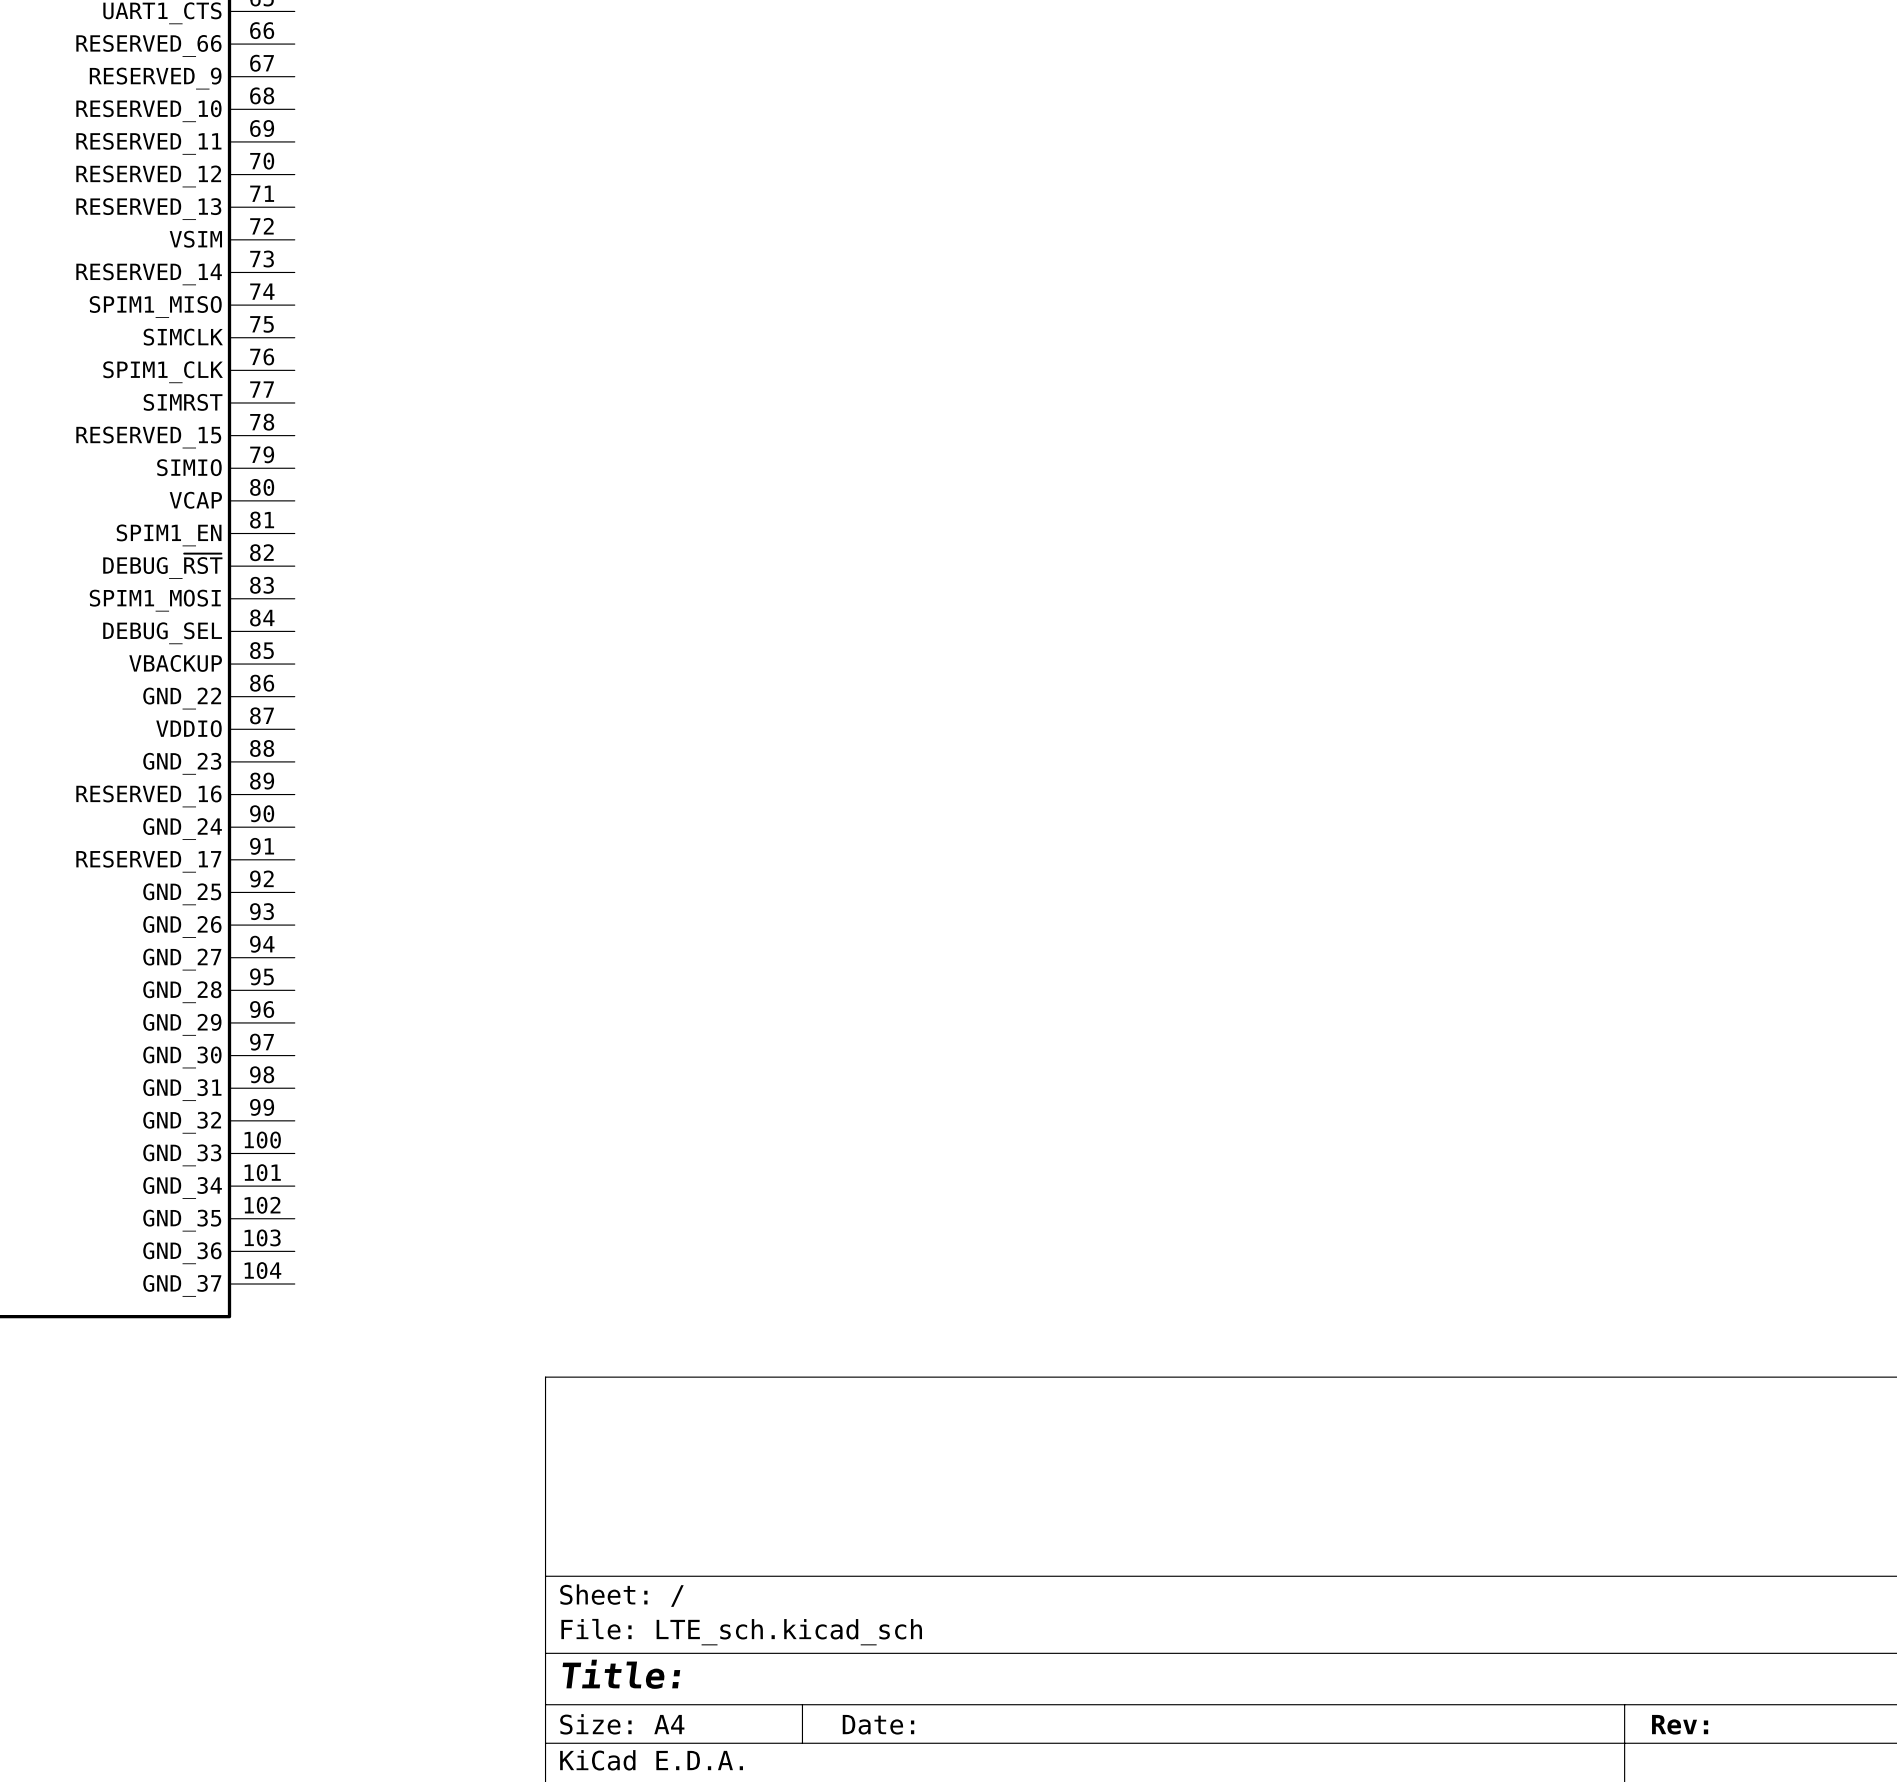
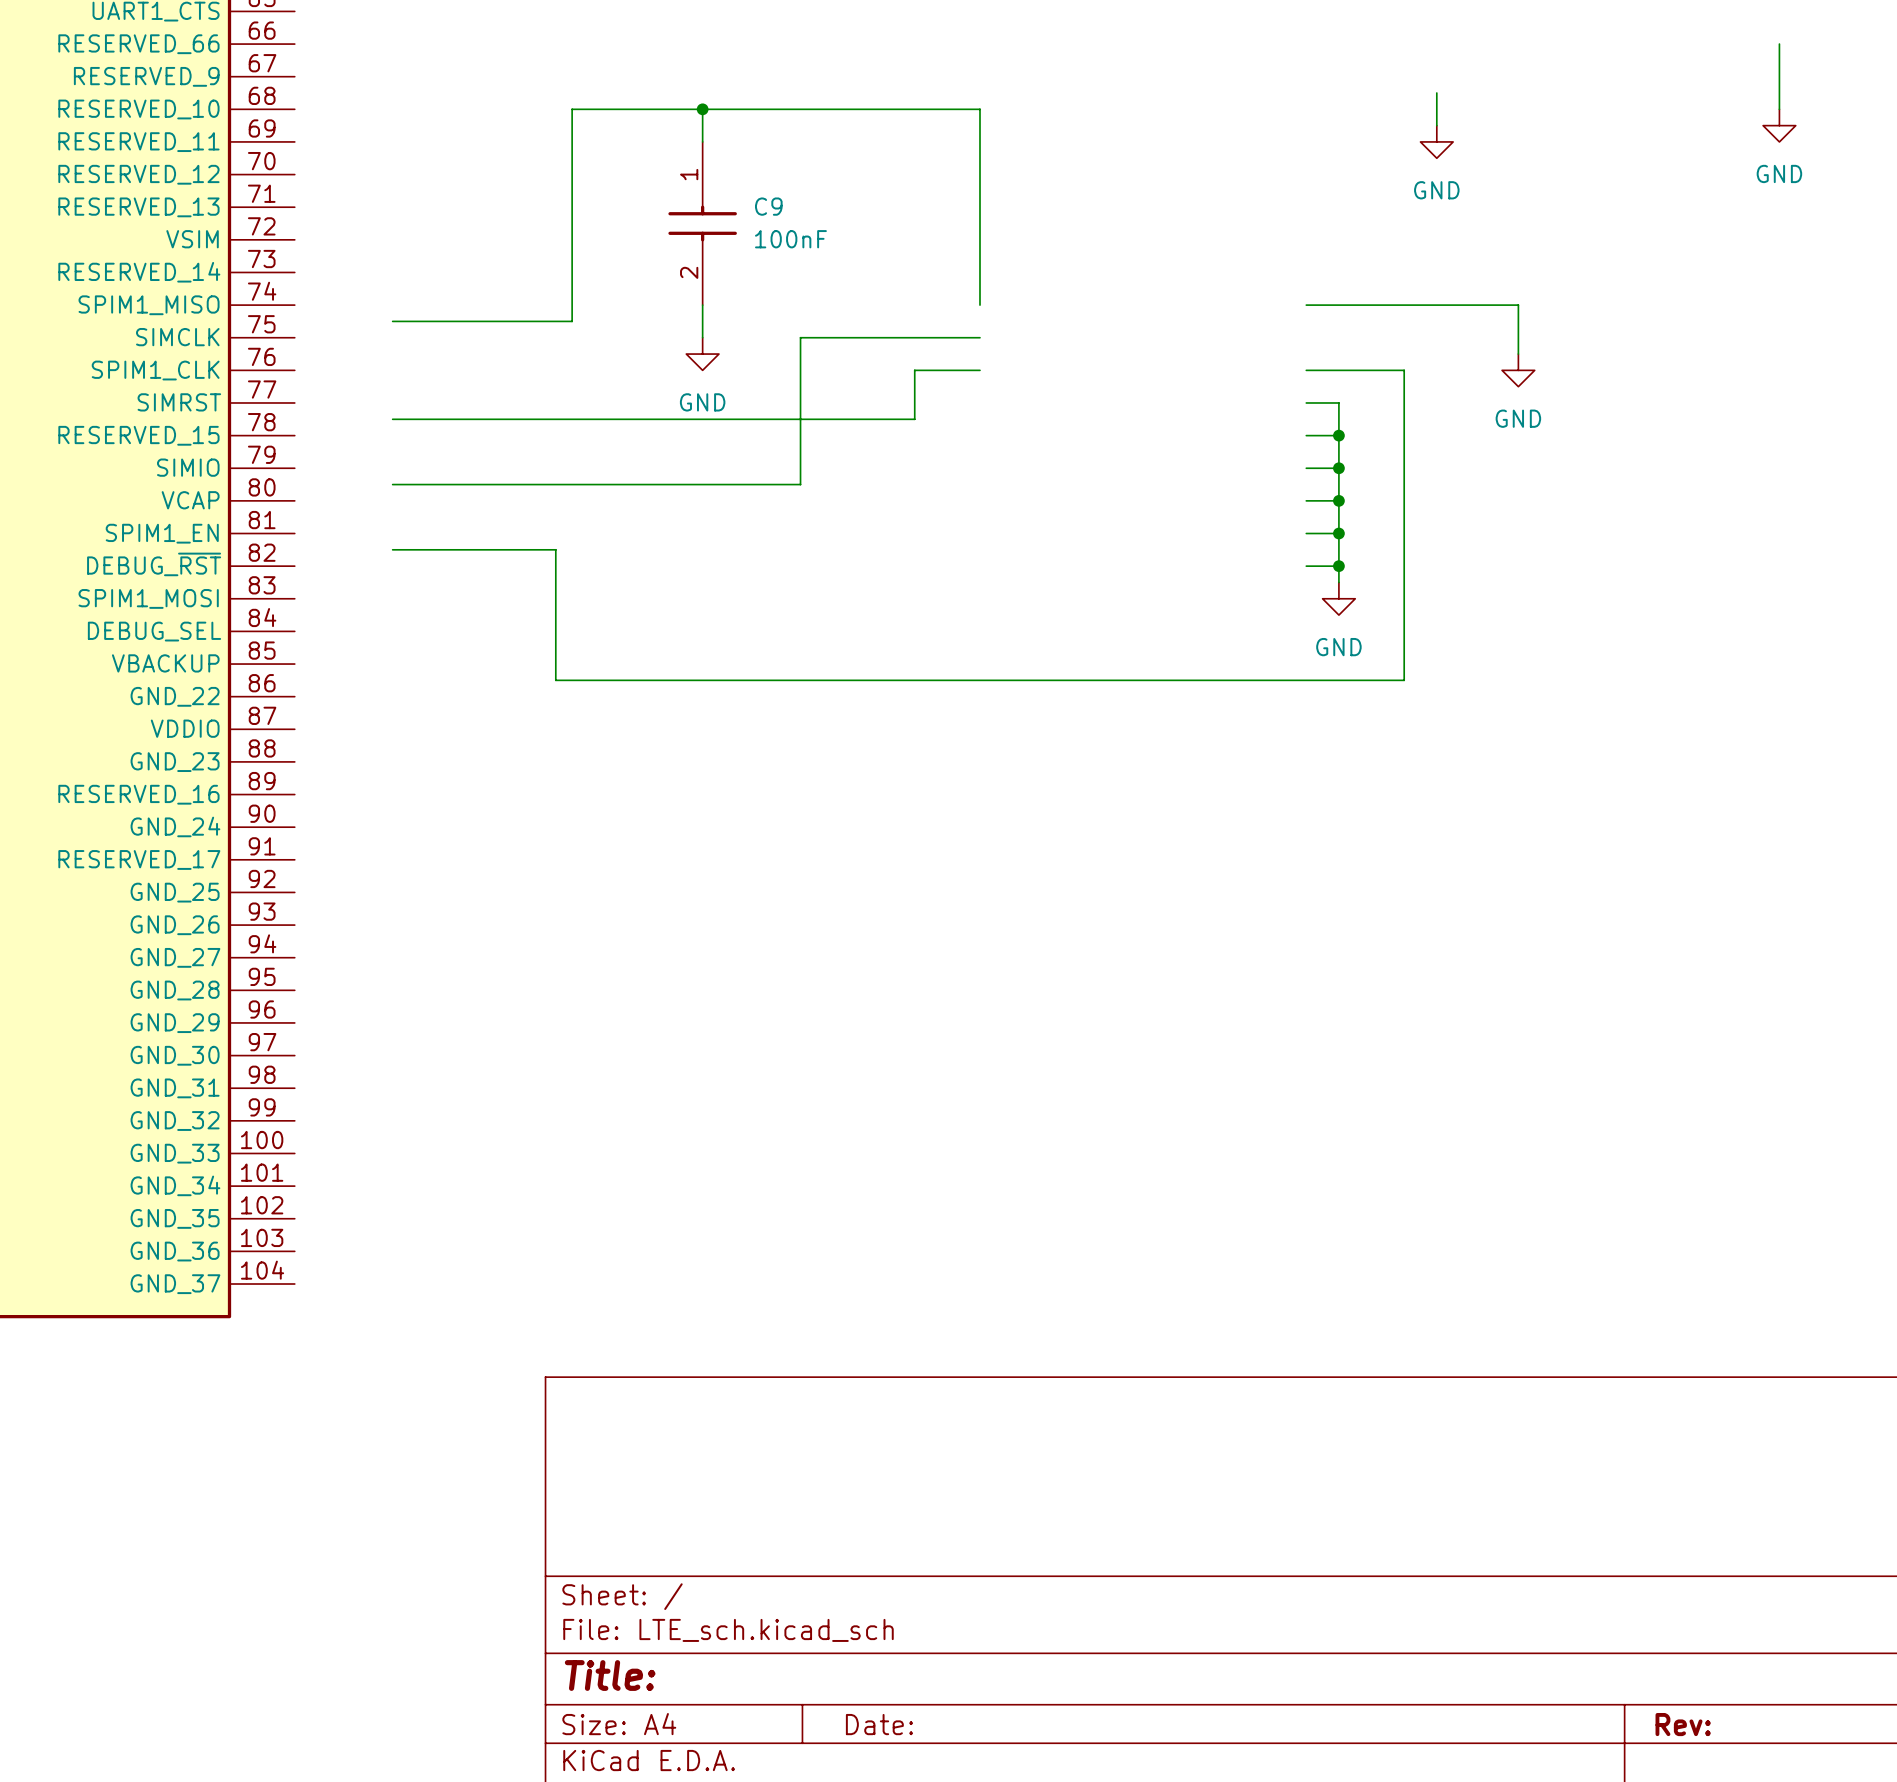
wire: none -> (1779, 44) (1779, 109)
wire: none -> (1436, 93) (1436, 125)
wire: none -> (702, 109) (702, 141)
junction: none -> (702, 109)
power symbol: none -> GND (1779, 125)
power symbol: none -> GND (1436, 141)
C9: none -> 100nF (702, 223)
wire: none -> (702, 305) (702, 337)
wire: none -> (979, 305) (979, 109) (572, 109) (572, 321) (392, 321)
wire: none -> (1306, 305) (1518, 305) (1518, 354)
wire: none -> (979, 337) (800, 337) (800, 484) (392, 484)
power symbol: none -> GND (702, 354)
wire: none -> (979, 370) (914, 370) (914, 419) (392, 419)
wire: none -> (1306, 370) (1404, 370) (1404, 680) (555, 680) (555, 549) (392, 549)
power symbol: none -> GND (1518, 370)
wire: none -> (1306, 402) (1338, 402) (1338, 582)
wire: none -> (1306, 435) (1338, 435)
junction: none -> (1338, 435)
wire: none -> (1306, 468) (1338, 468)
junction: none -> (1338, 468)
wire: none -> (1306, 500) (1338, 500)
junction: none -> (1338, 500)
wire: none -> (1306, 533) (1338, 533)
junction: none -> (1338, 533)
wire: none -> (1306, 566) (1338, 566)
junction: none -> (1338, 566)
power symbol: none -> GND (1338, 598)

